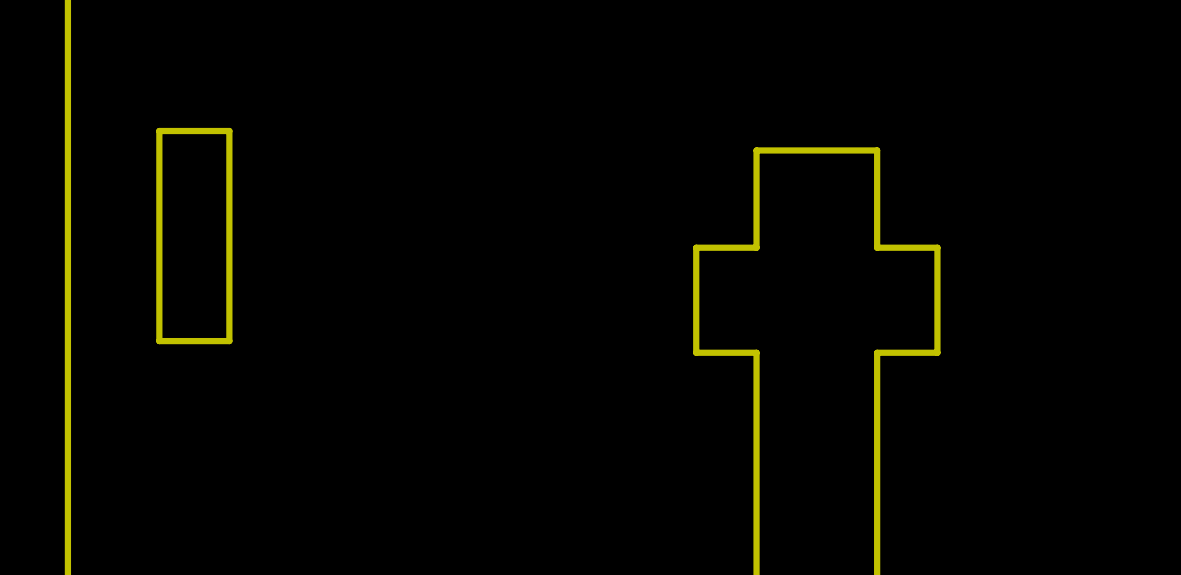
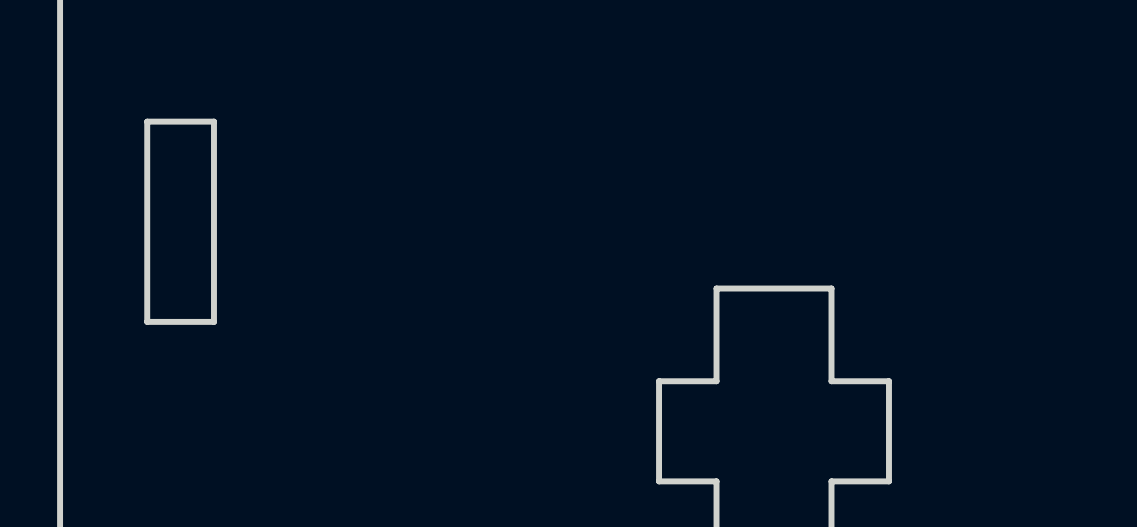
board edge: (877, 352) (937, 352) (937, 247) (877, 247) (877, 150) (756, 150) (756, 247) (696, 247) (696, 352) (756, 352) -> (831, 333) (831, 288) (716, 288) (716, 333)
board edge: (756, 403) (756, 508) -> (716, 381) (659, 381) (659, 481) (716, 481)
board edge: (877, 403) (877, 508) -> (831, 381) (888, 381) (888, 481) (831, 481)

